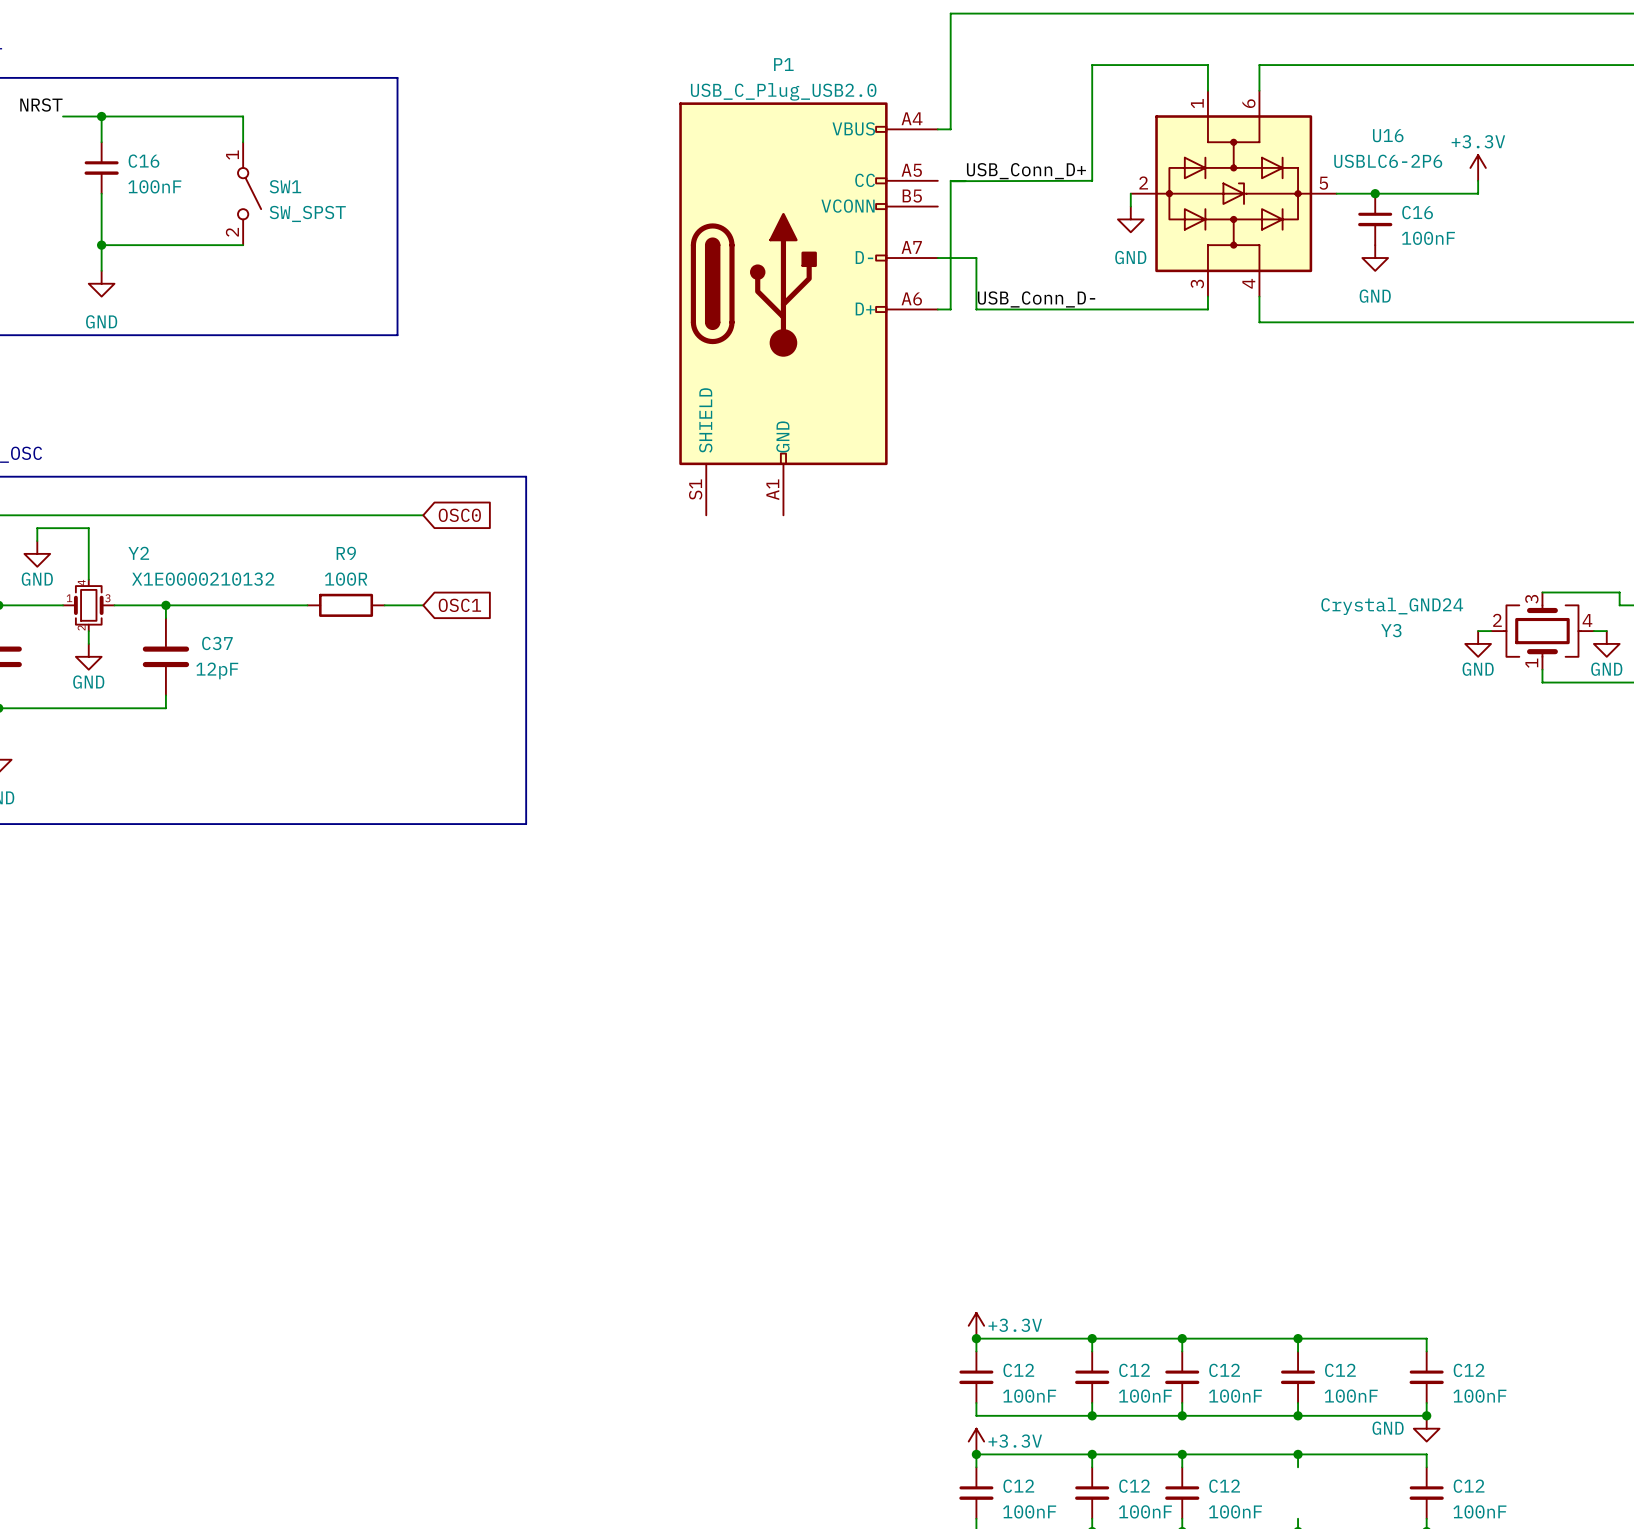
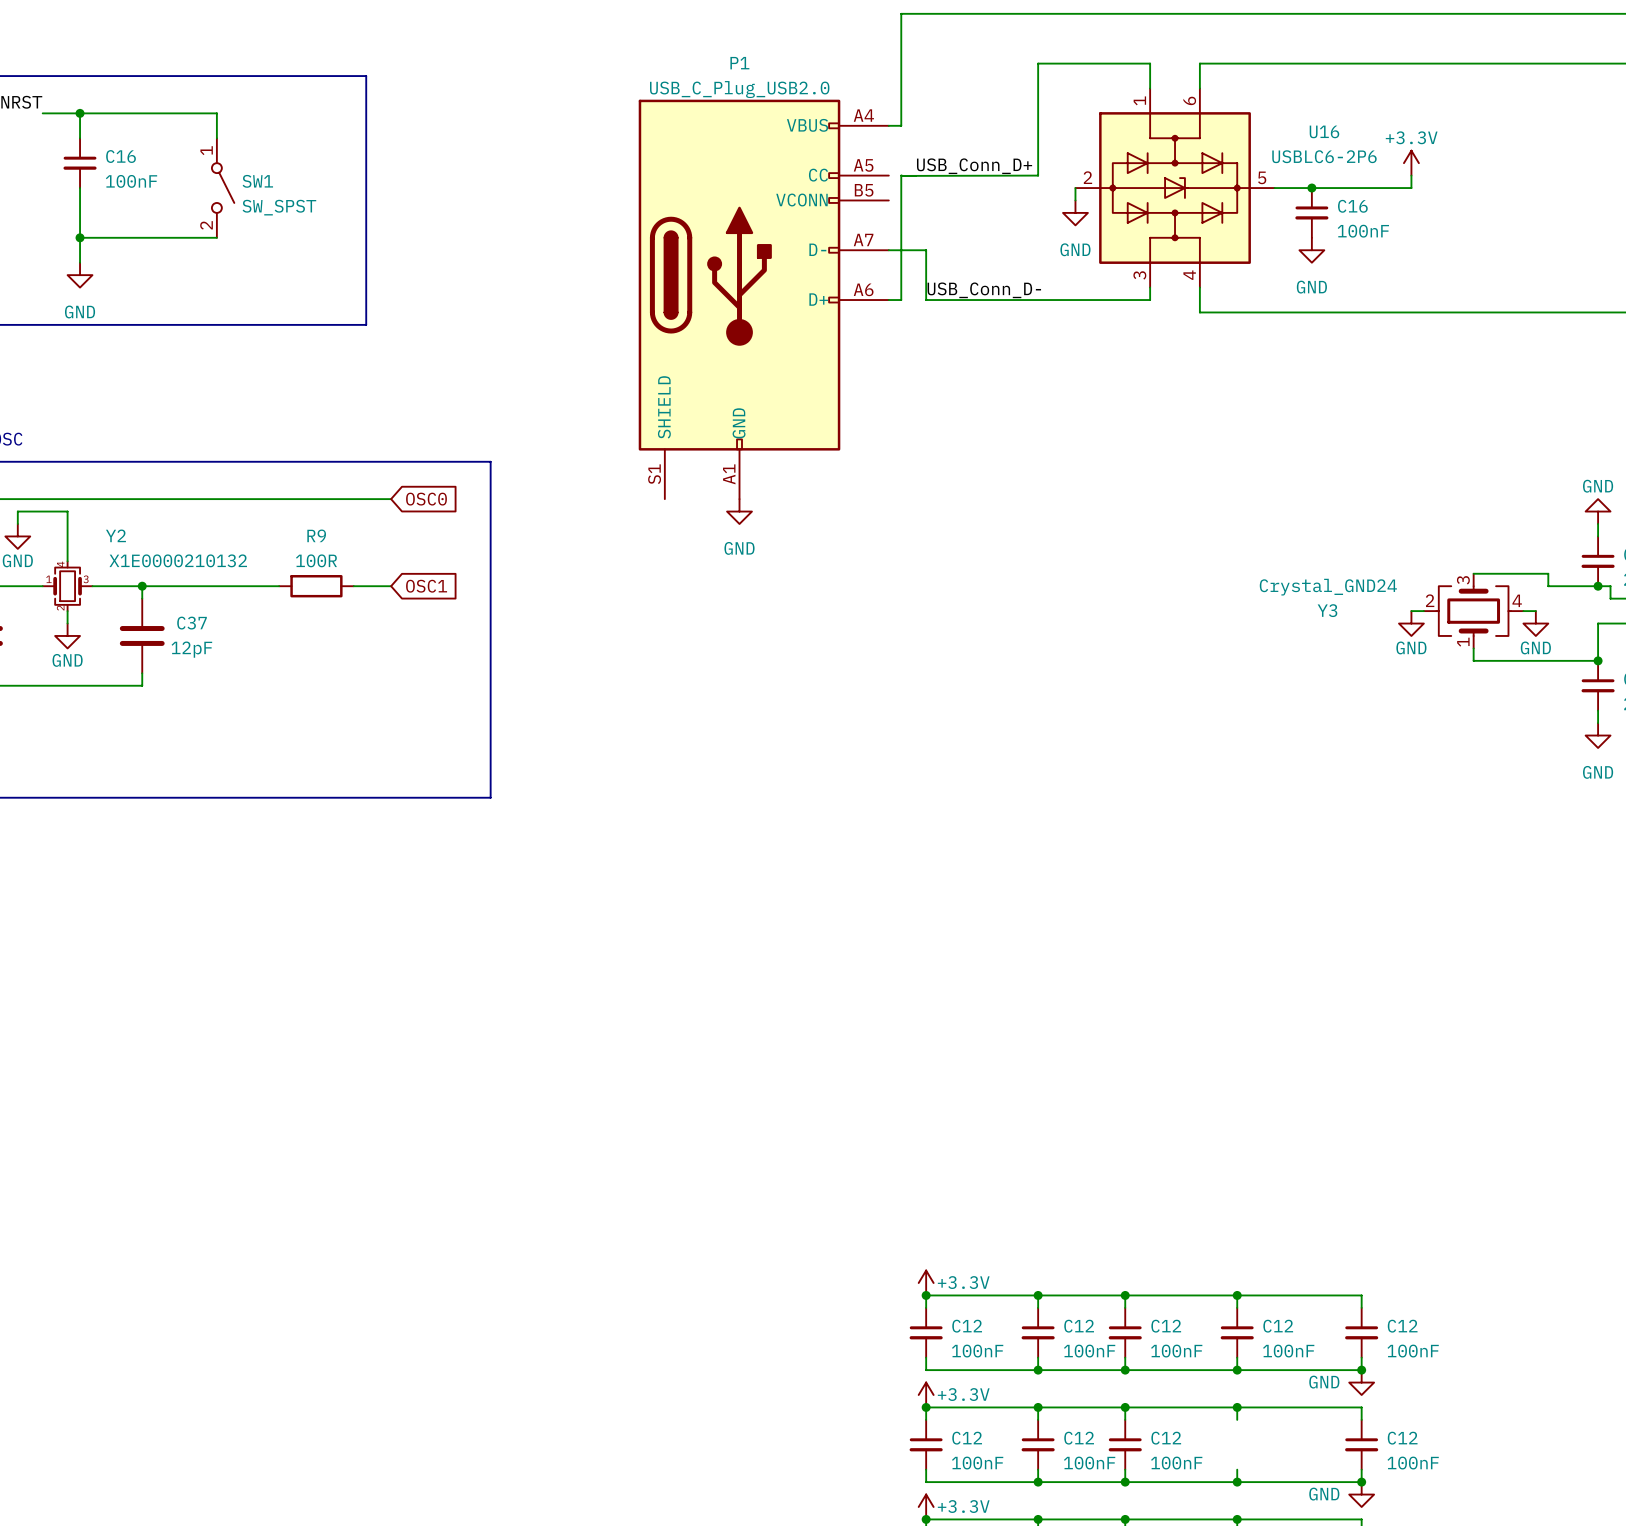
power symbol: none -> GND (739, 511)

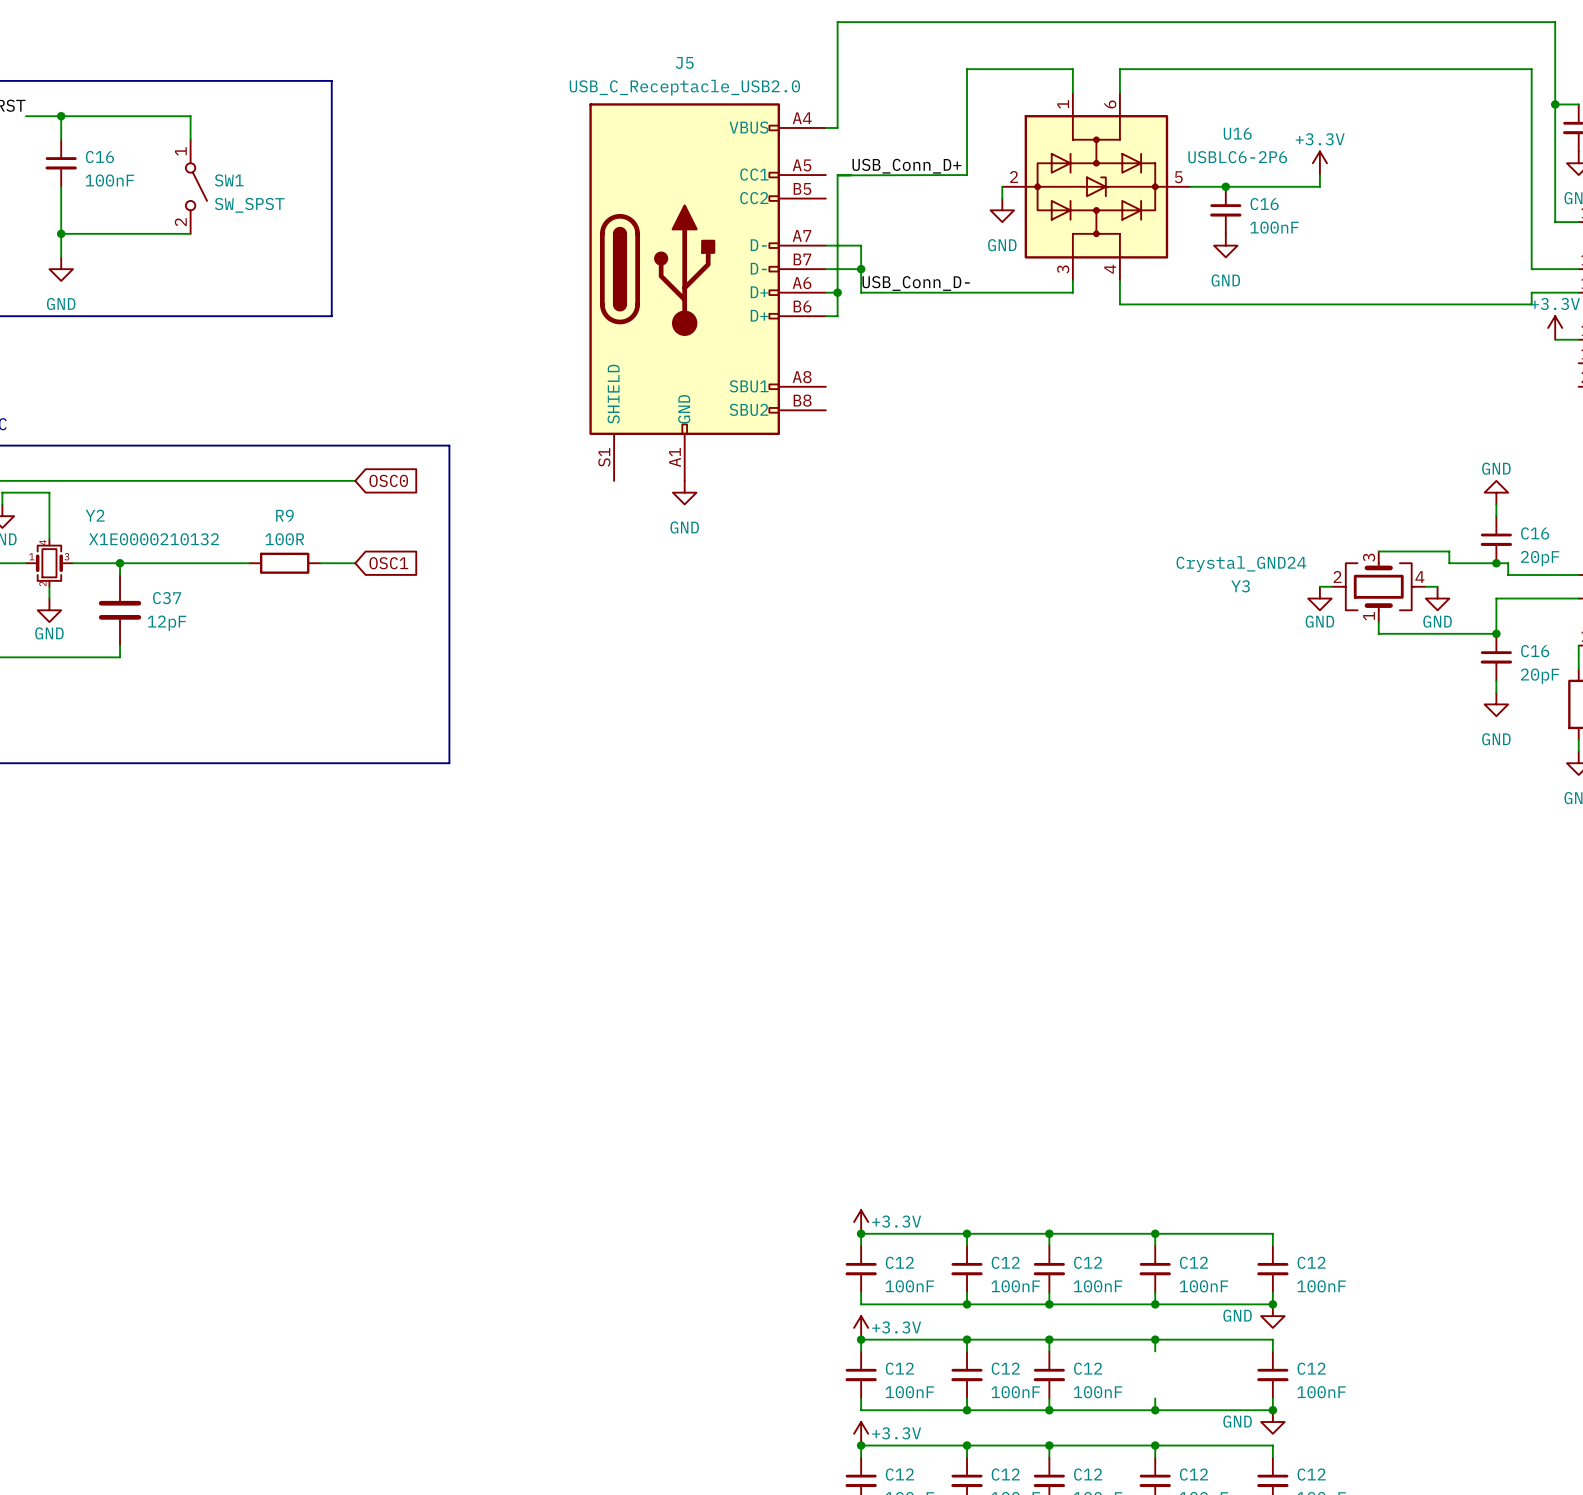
wire: none -> (825, 269) (861, 269)
junction: none -> (861, 269)
P1: USB_C_Plug_USB2.0 (763, 299) -> none
J5: none -> USB_C_Receptacle_USB2.0 (707, 292)
wire: none -> (837, 292) (837, 316) (825, 316)
junction: none -> (837, 292)

